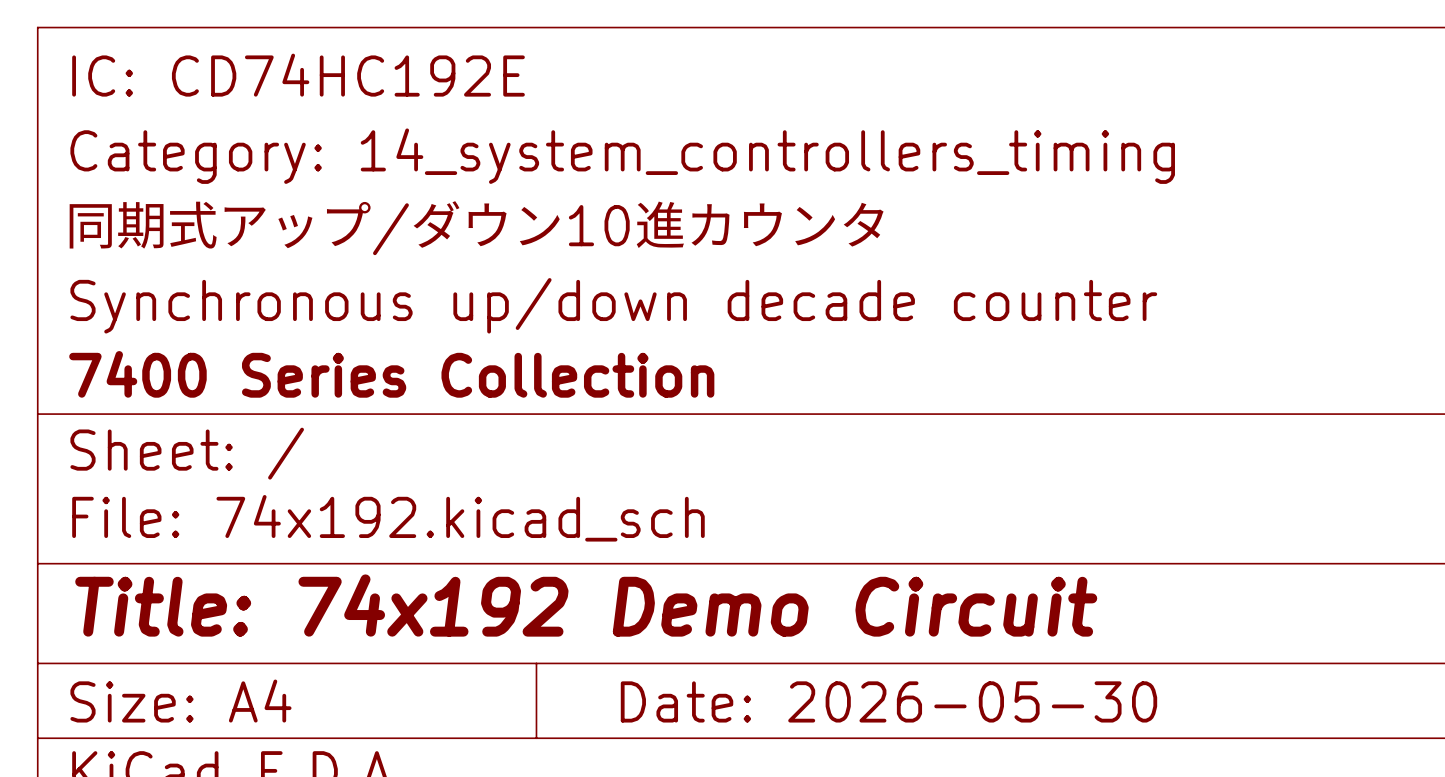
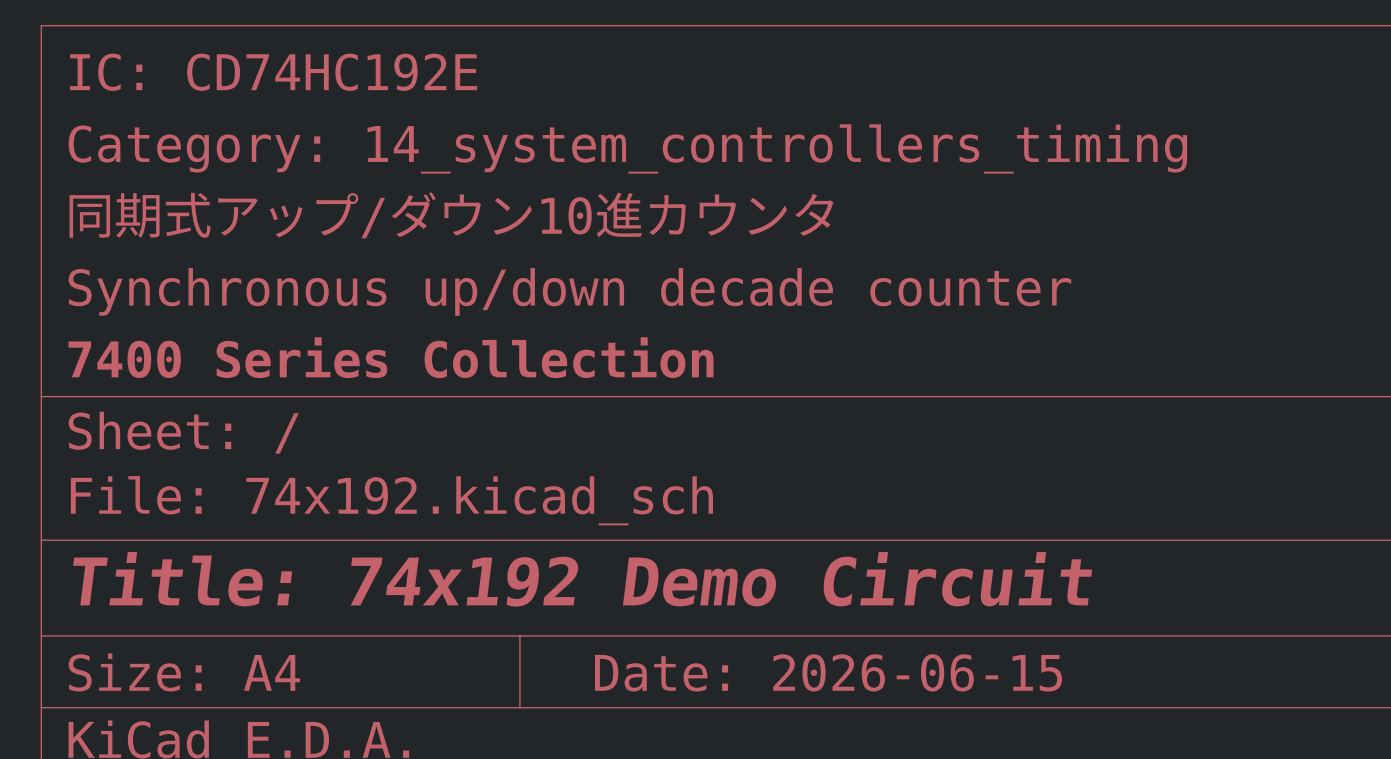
title block: Date: 2026-05-30 (888, 701) -> Date: 2026-06-15 (828, 672)

